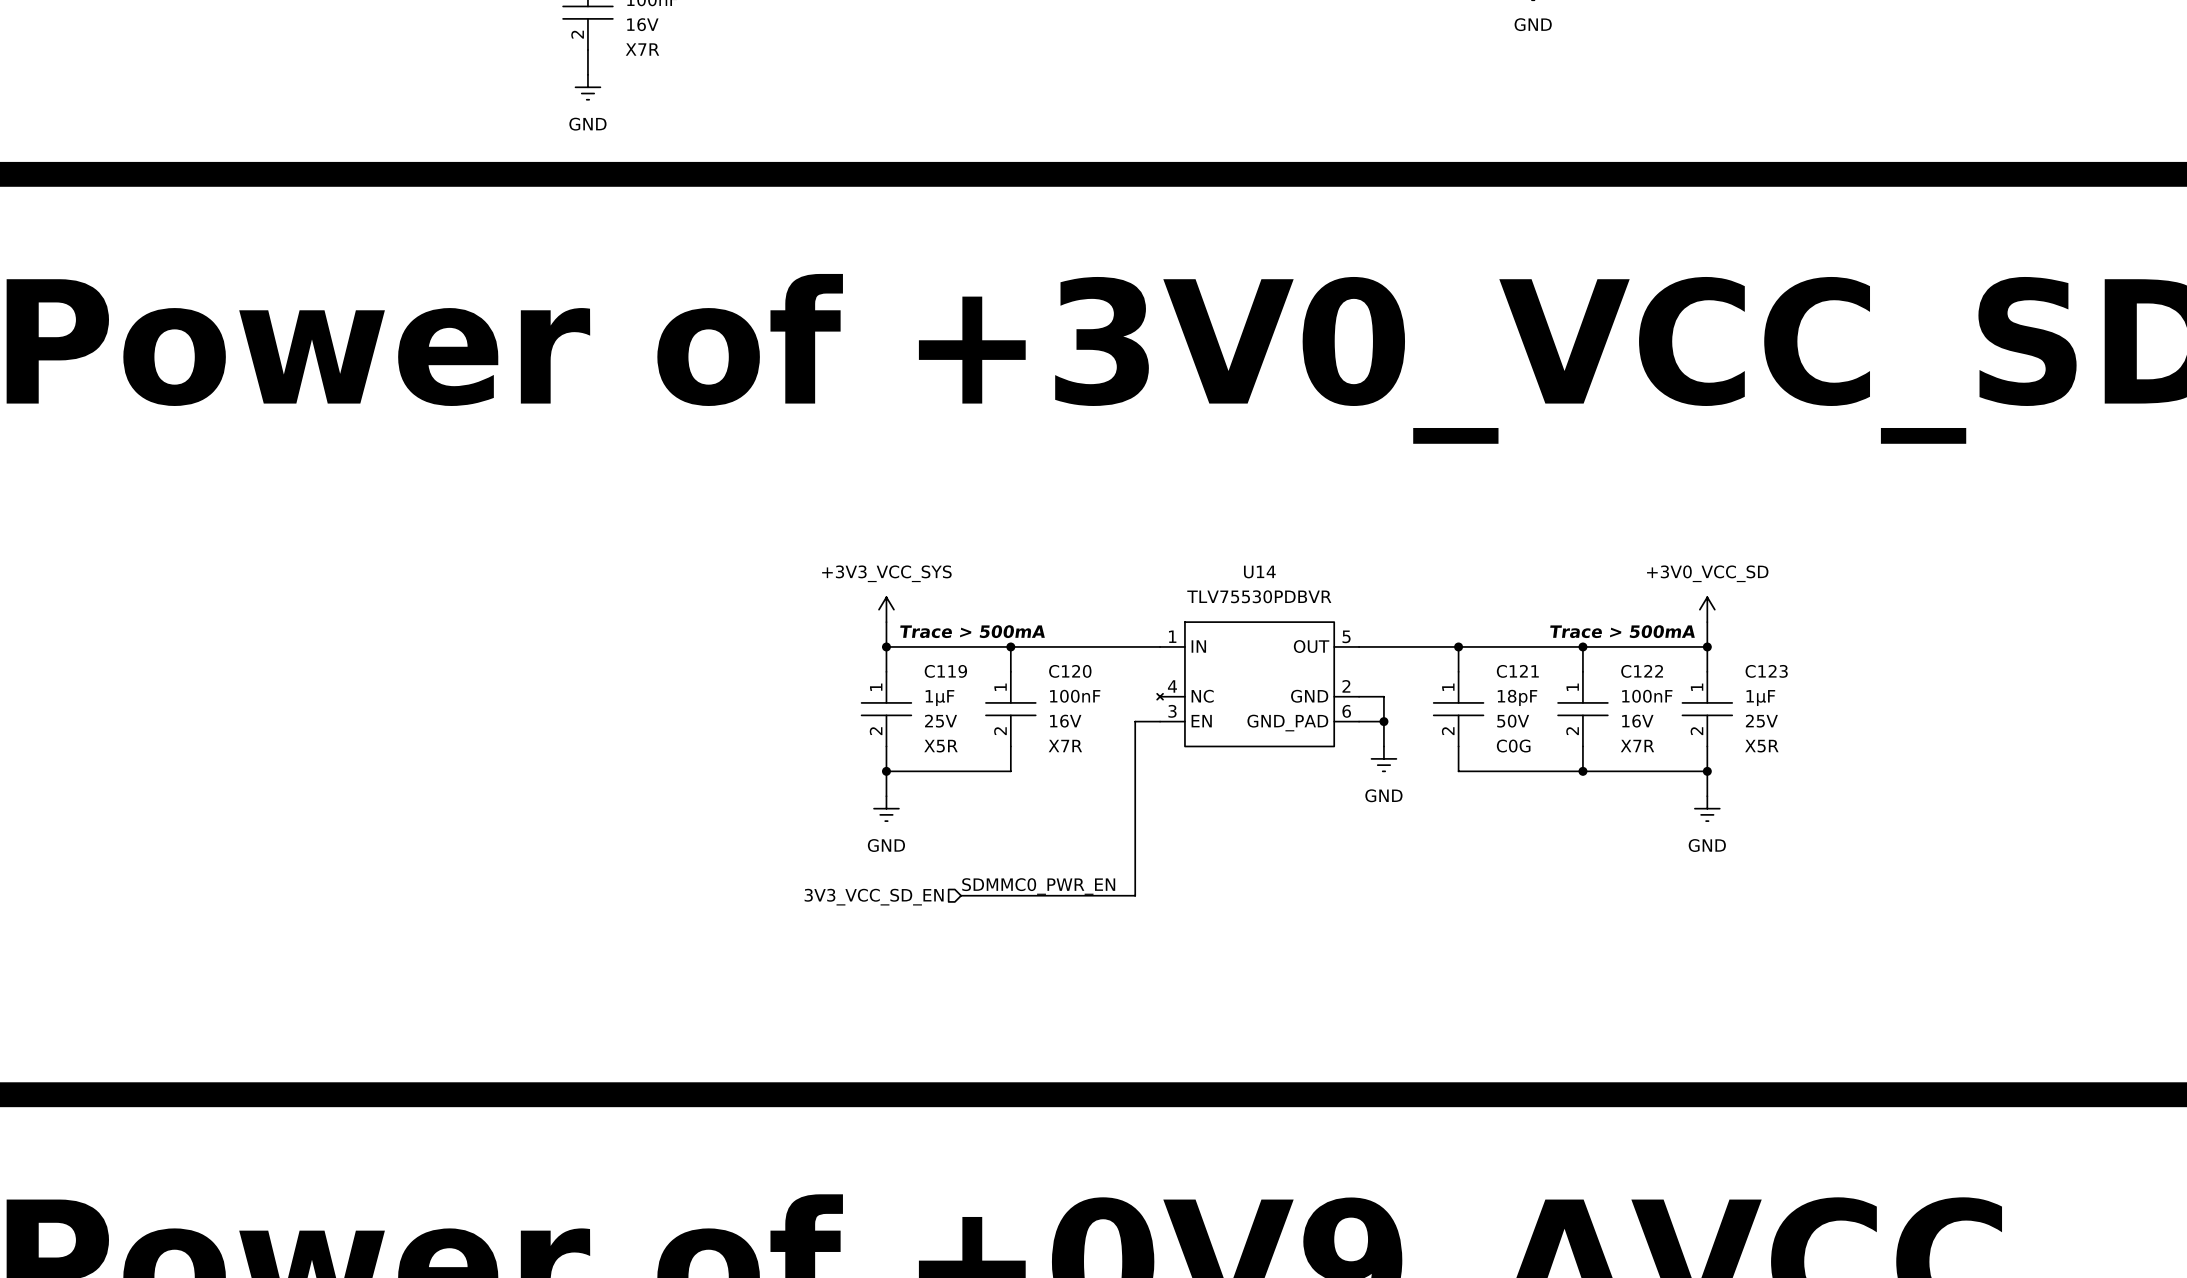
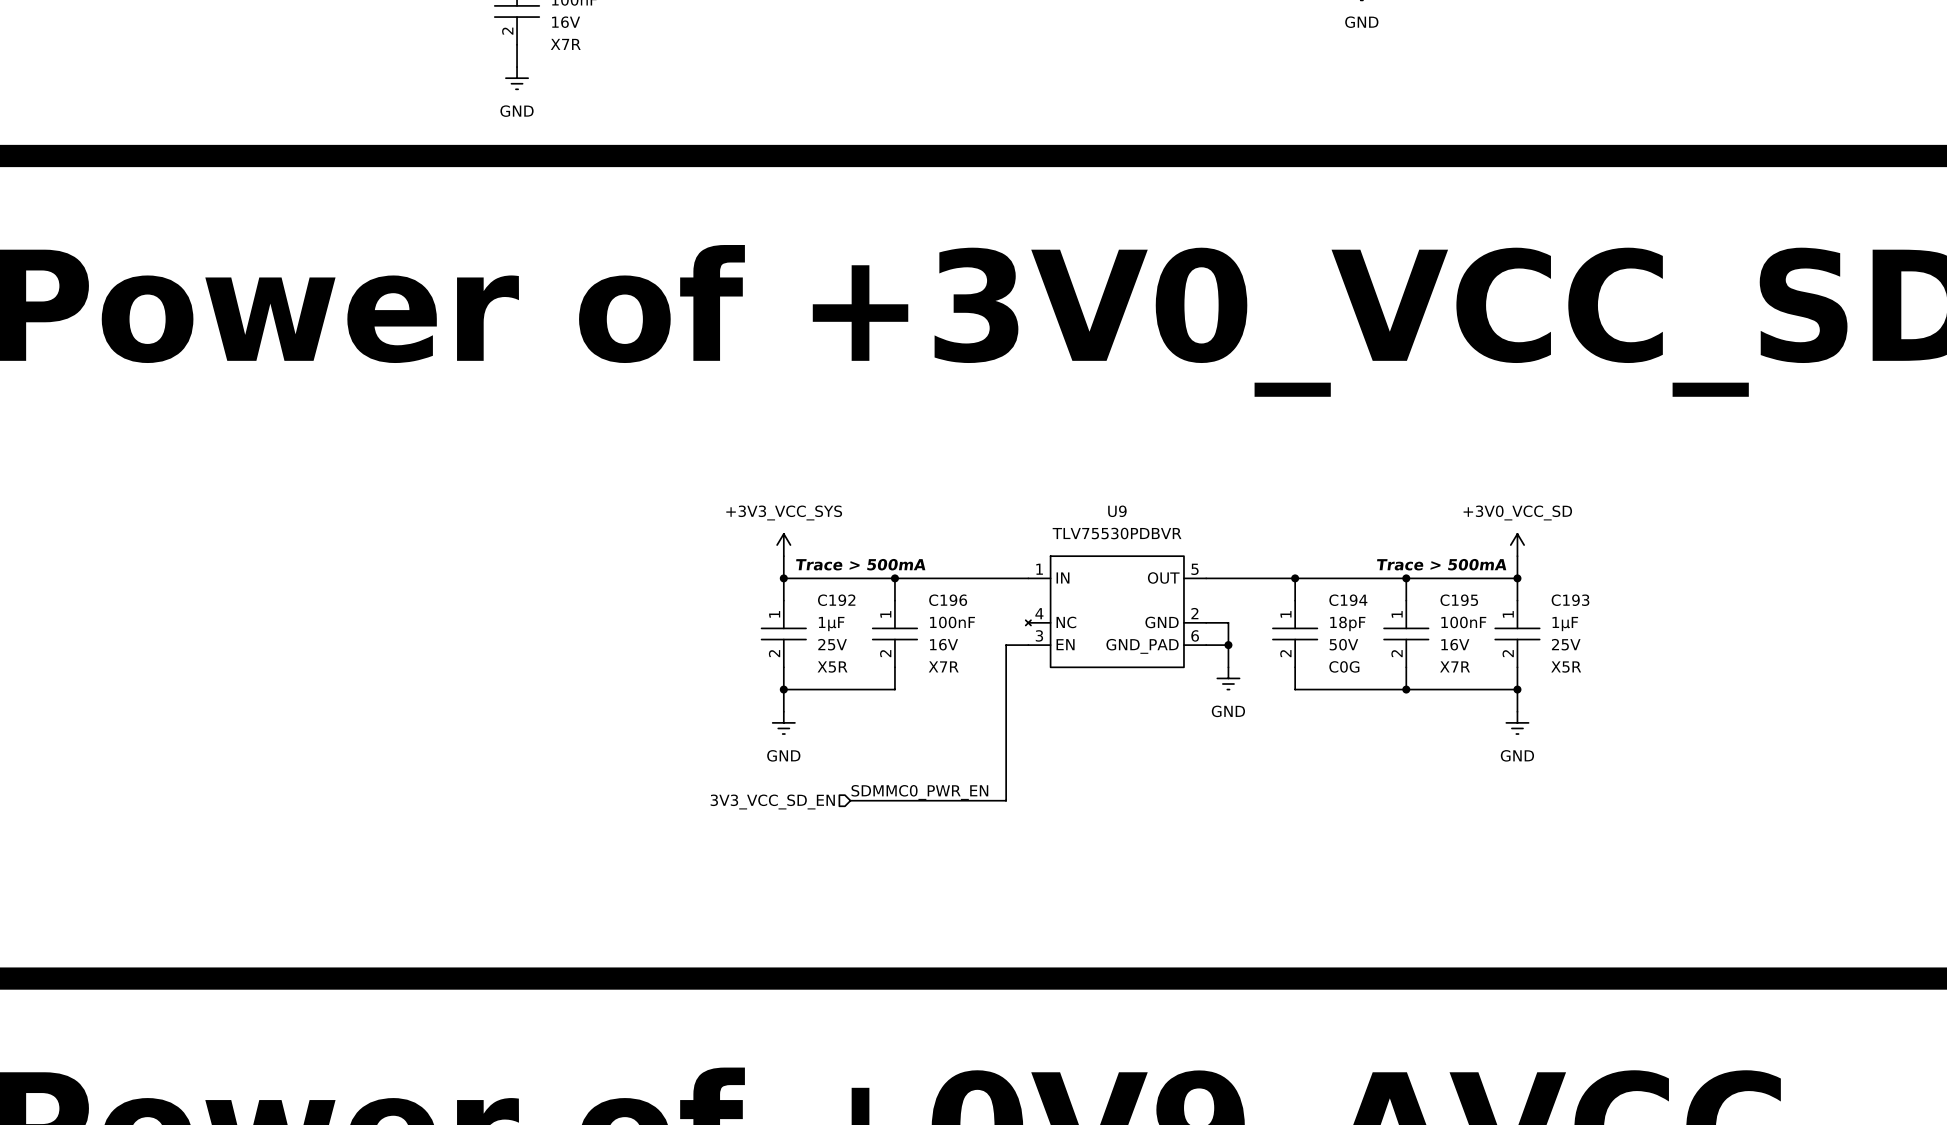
U14 name: U14 (1259, 572) -> U9 (1117, 511)
C119 name: C119 (945, 671) -> C192 (836, 600)
C120 name: C120 (1070, 671) -> C196 (948, 600)
C121 name: C121 (1517, 671) -> C194 (1348, 600)
C122 name: C122 (1642, 671) -> C195 (1459, 600)
C123 name: C123 (1766, 671) -> C193 (1570, 600)

